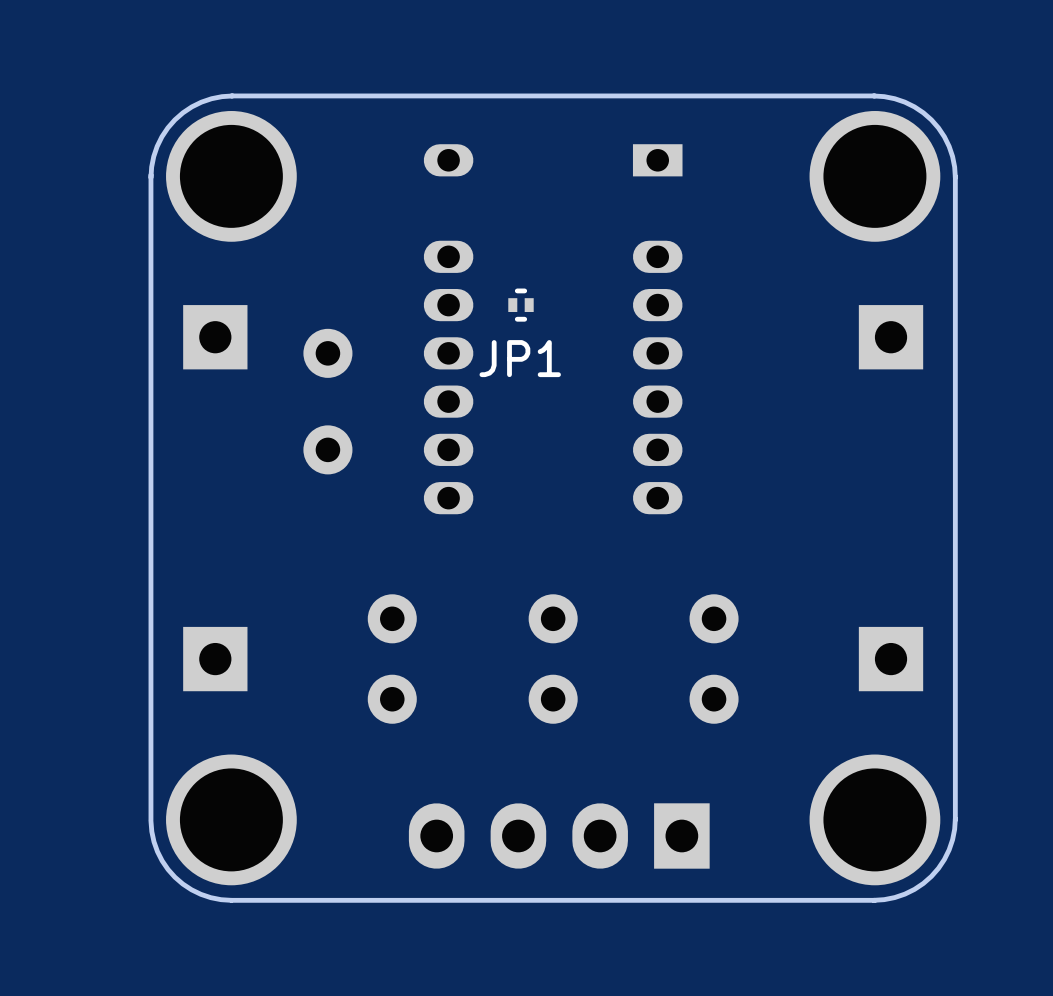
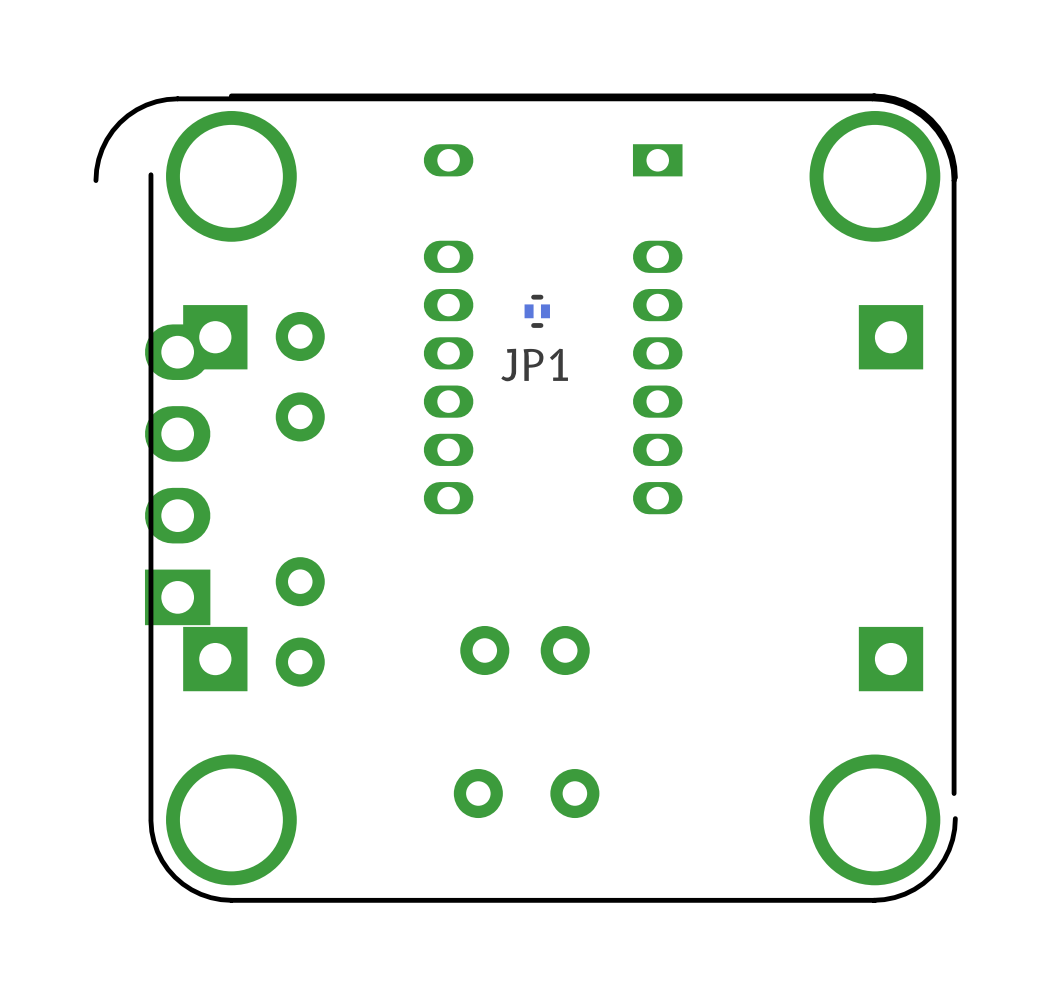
board edge: (232, 95) (201, 102) (174, 119) (157, 146) (150, 177) -> none
board edge: (955, 176) (955, 819) -> none
board edge: none -> (95, 180) (102, 149) (119, 122) (136, 109) (167, 99) (872, 98) (893, 101) (922, 115) (937, 130) (947, 149) (954, 180) (954, 793)
JP1 position: (520, 305) -> (537, 311)
part: none -> (300, 376)
part rotation: 0° (327, 401) -> 90° clockwise (526, 793)
part position: (327, 401) -> (526, 793)
part position: (392, 659) -> (300, 621)
part rotation: 0° (553, 659) -> 90° clockwise (525, 650)
part: (714, 659) -> none
part rotation: 0° (559, 835) -> 90° clockwise (177, 474)
part position: (559, 835) -> (177, 474)

